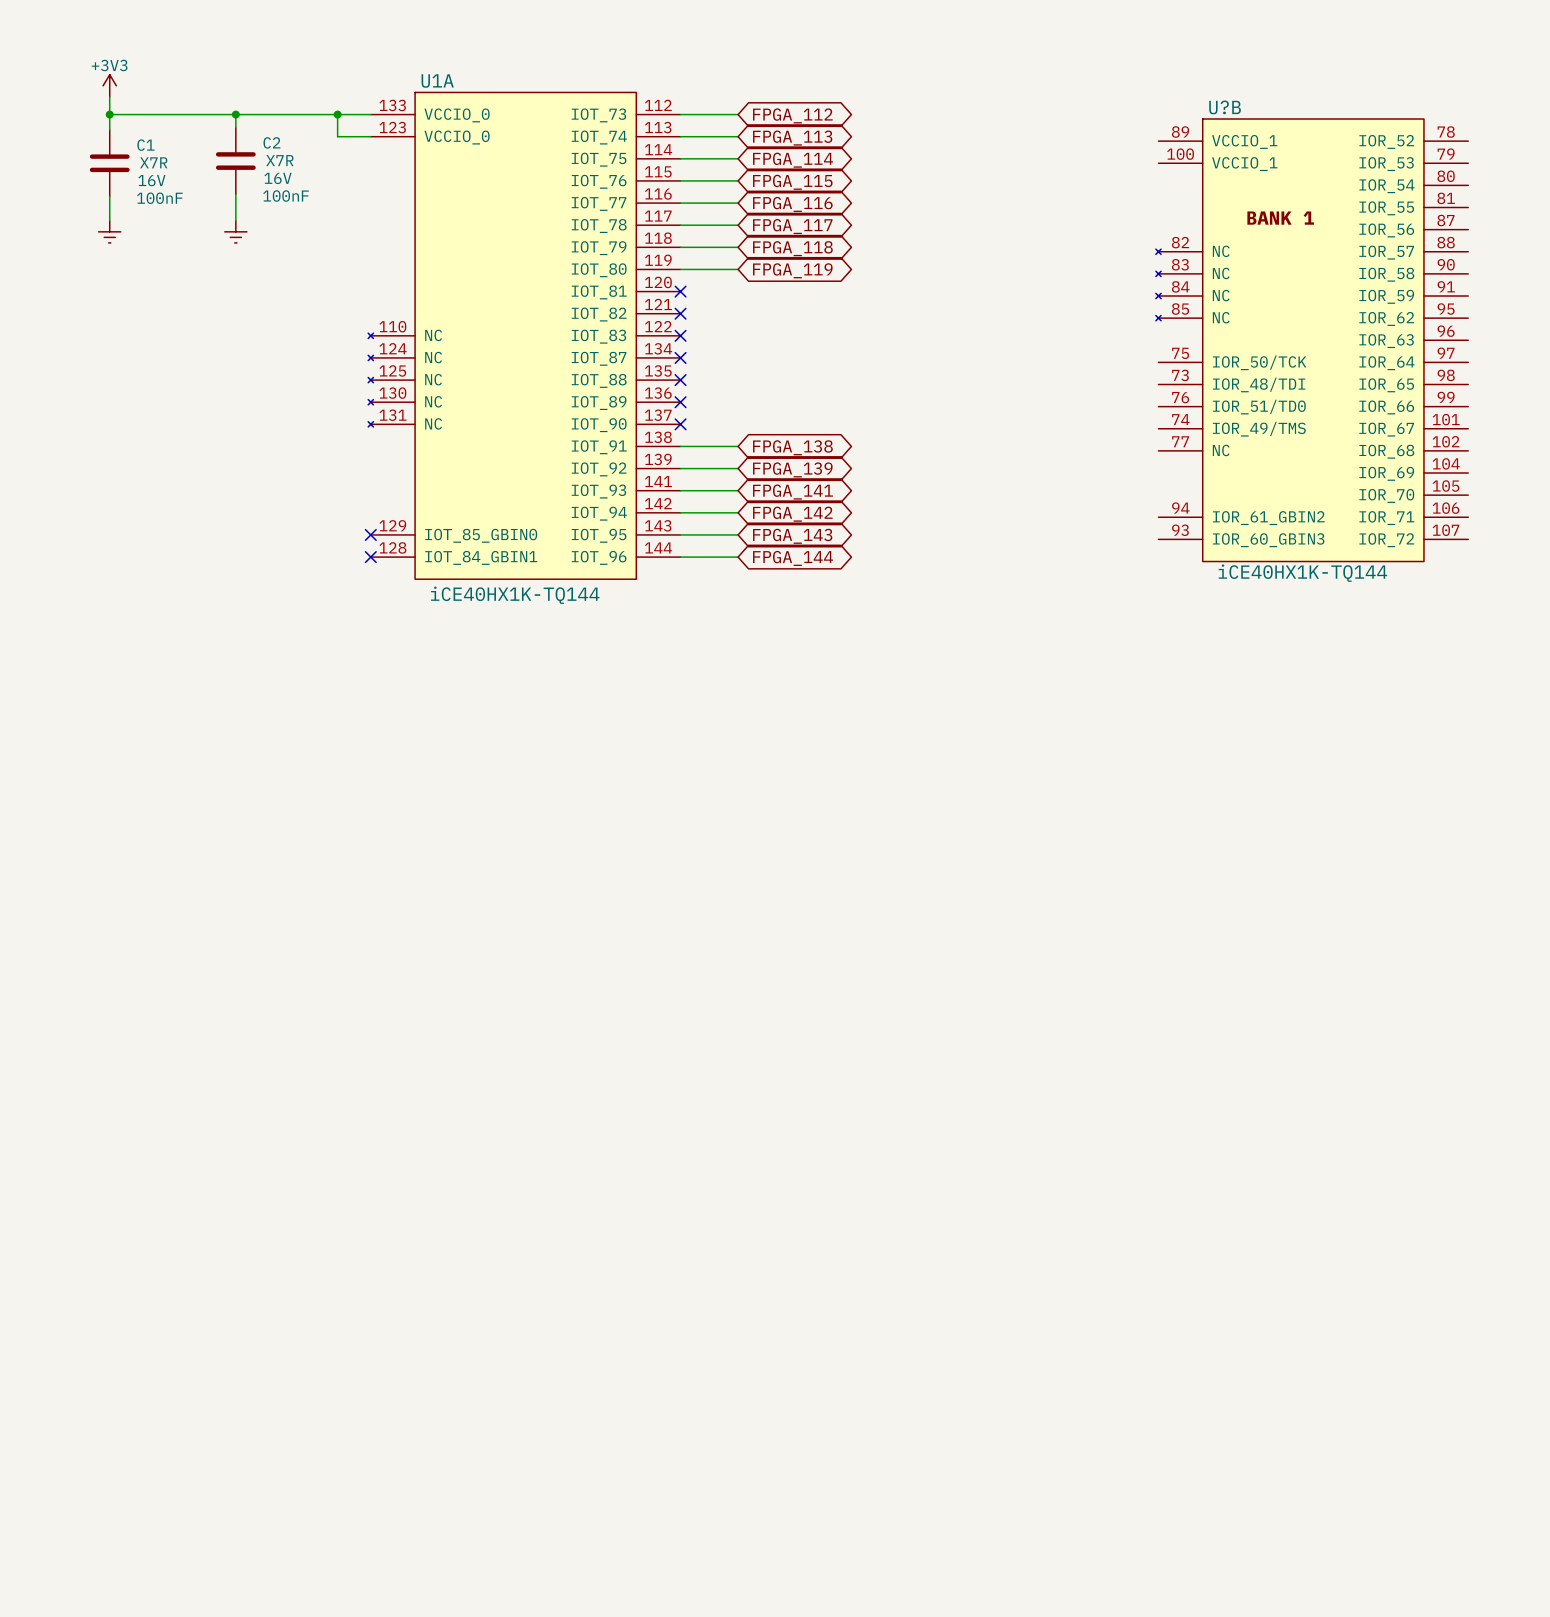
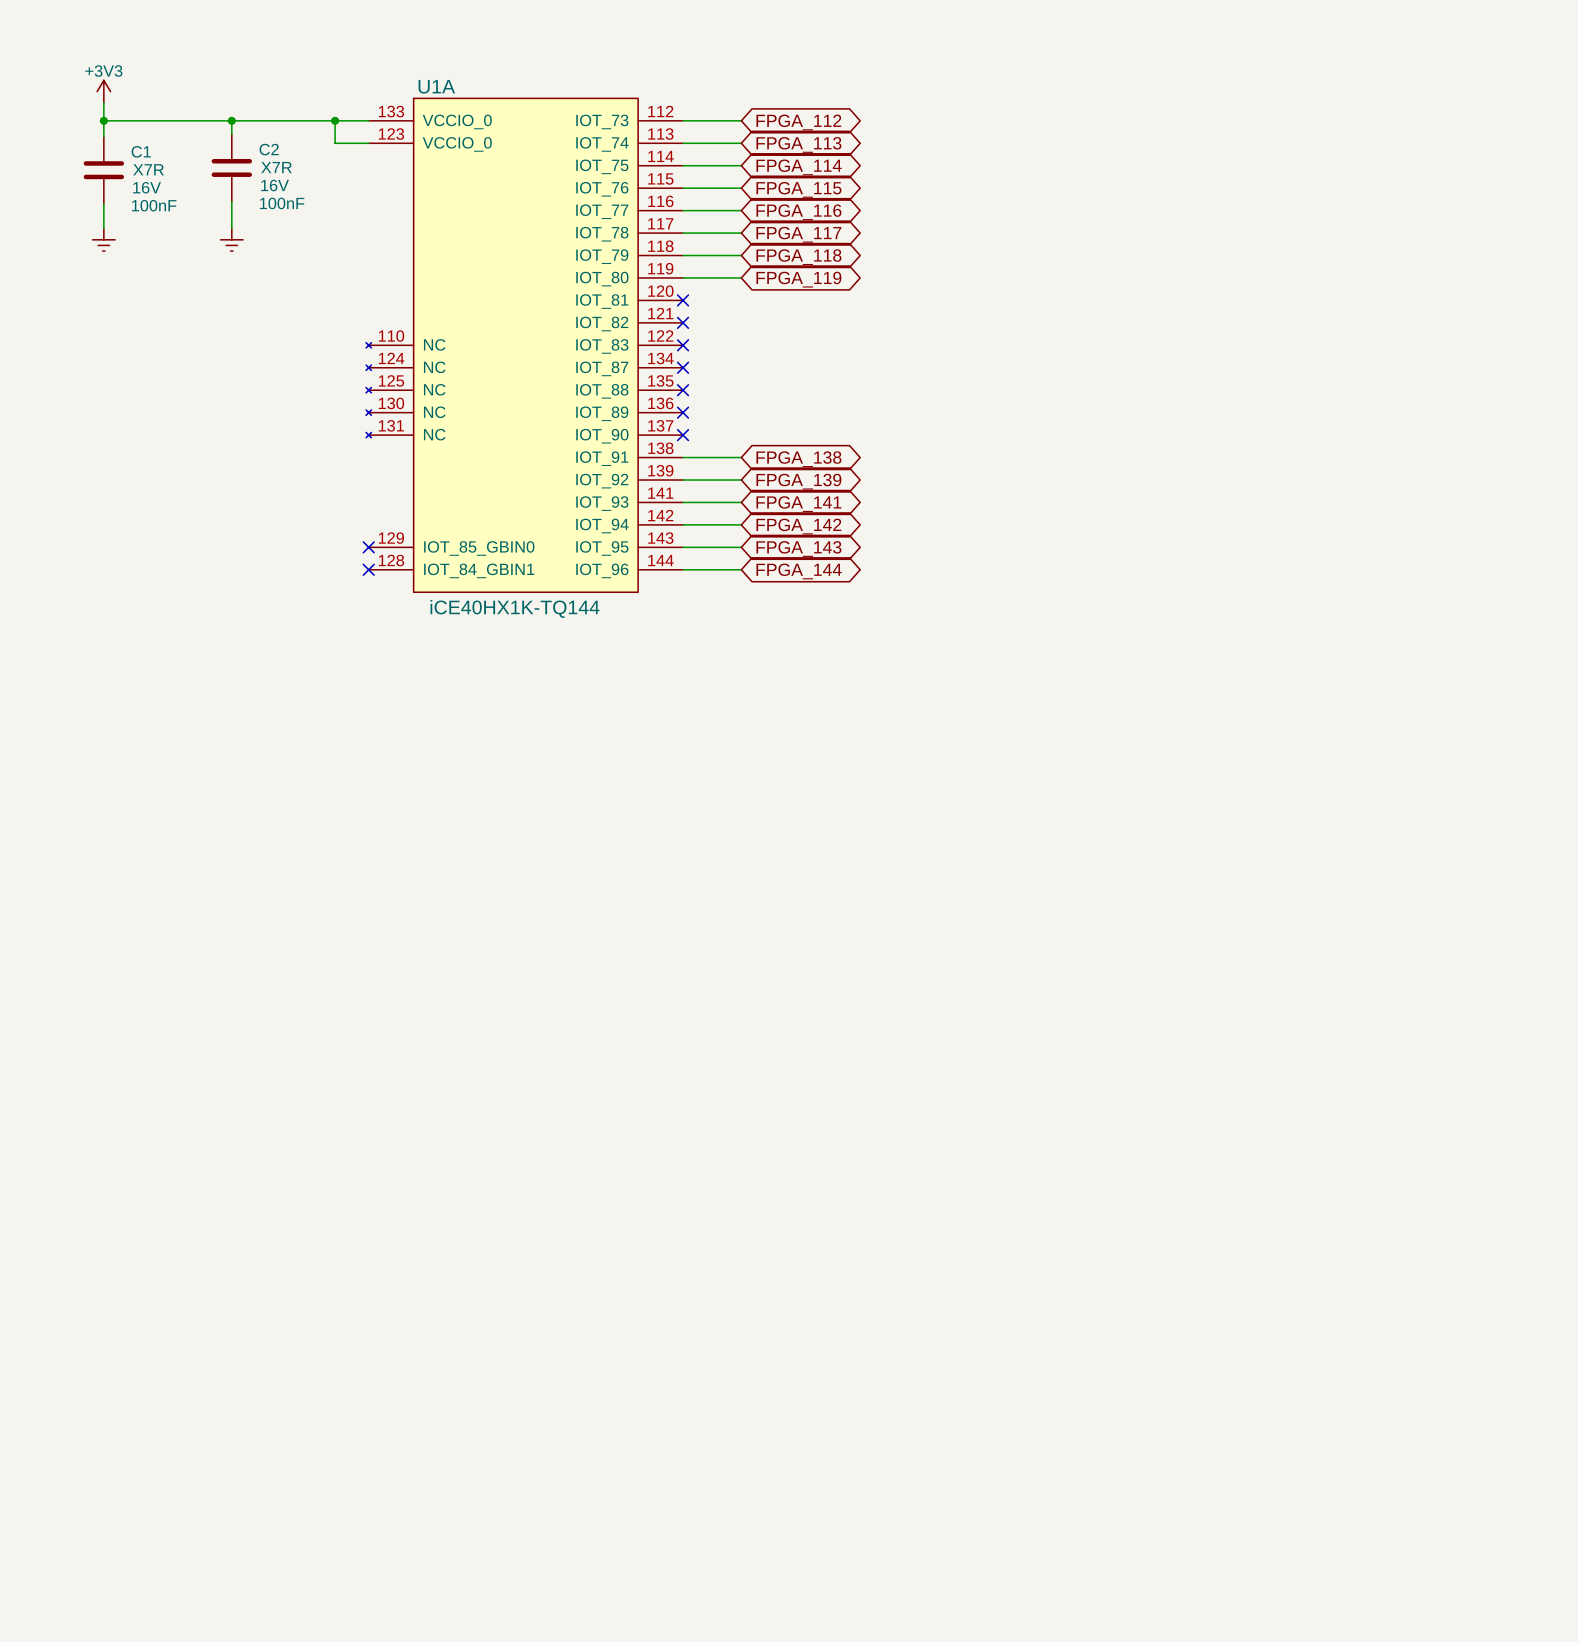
U?B: iCE40HX1K-TQ144 (1312, 340) -> none

